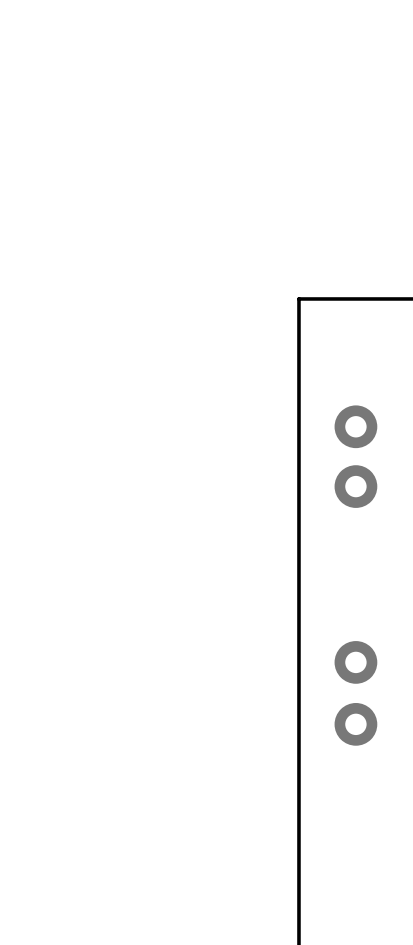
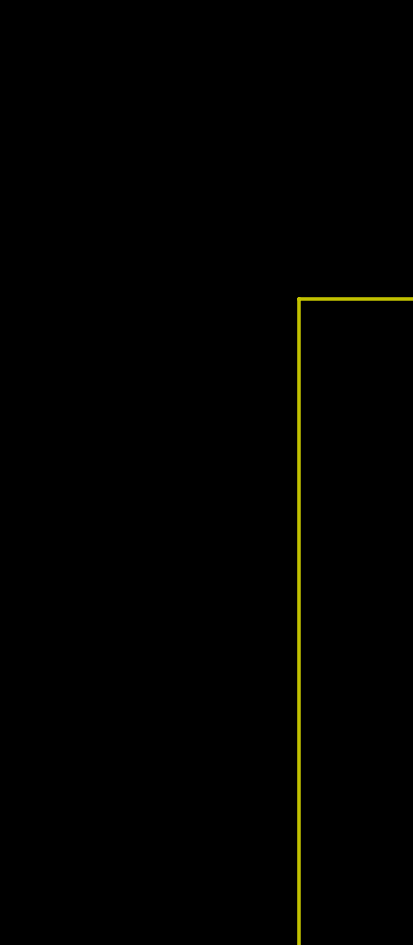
via: (355, 426) -> none
via: (355, 486) -> none
via: (355, 662) -> none
via: (355, 724) -> none

